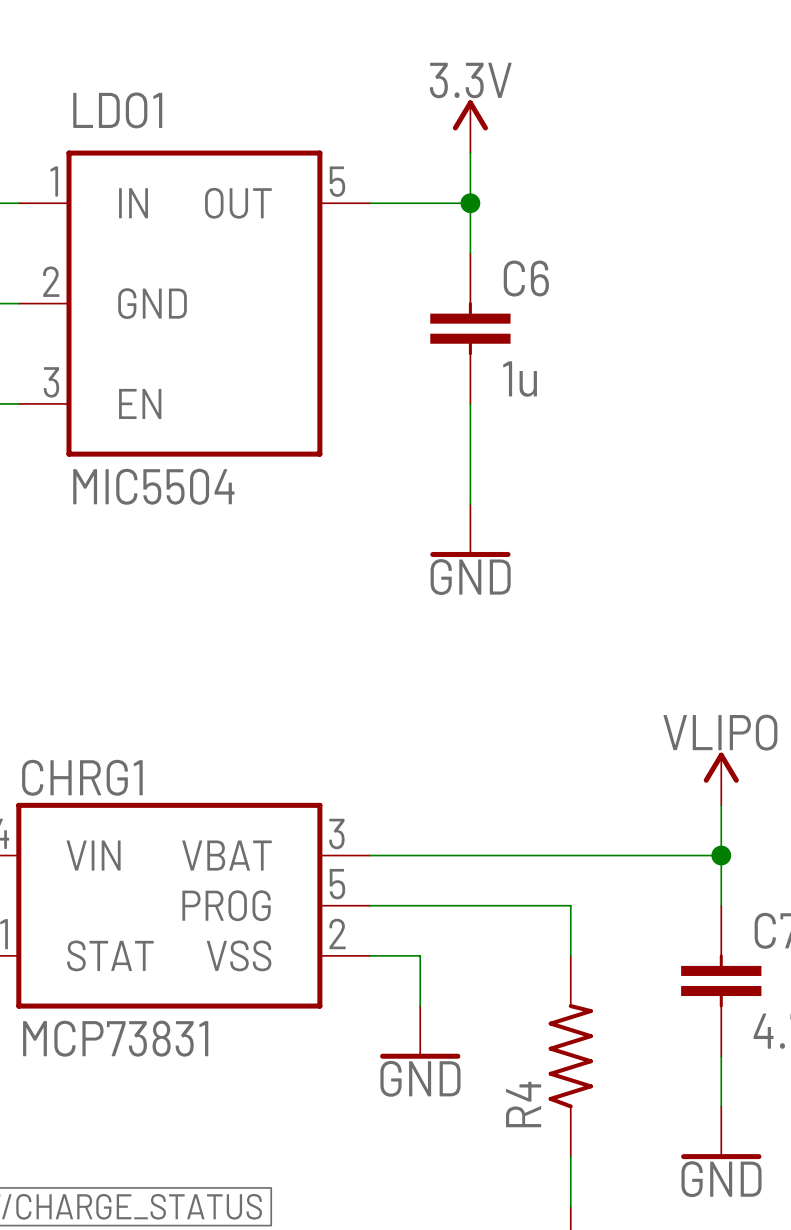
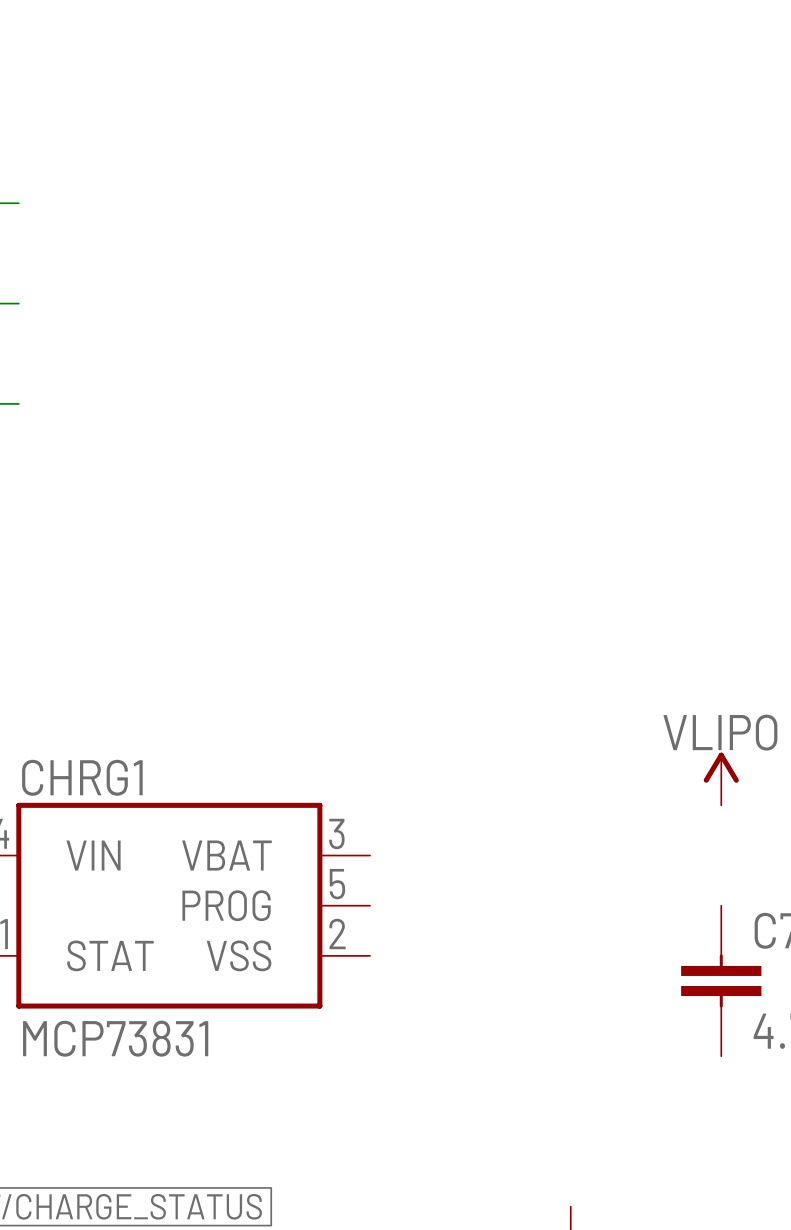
power symbol: 3.3V (470, 126) -> none
wire: (470, 153) (470, 253) -> none
wire: (370, 203) (470, 203) -> none
junction: (470, 203) -> none
LDO1: MIC5504 (194, 303) -> none
C6: 1u (470, 328) -> none
wire: (470, 403) (470, 504) -> none
power symbol: GND (470, 530) -> none
wire: (721, 805) (721, 905) -> none
wire: (370, 855) (721, 855) -> none
junction: (721, 855) -> none
wire: (370, 905) (570, 905) (570, 955) -> none
wire: (370, 955) (420, 955) (420, 1006) -> none
power symbol: GND (420, 1032) -> none
R4: (570, 1056) -> none
wire: (721, 1056) (721, 1106) -> none
power symbol: GND (721, 1132) -> none
wire: (570, 1156) (570, 1206) -> none

